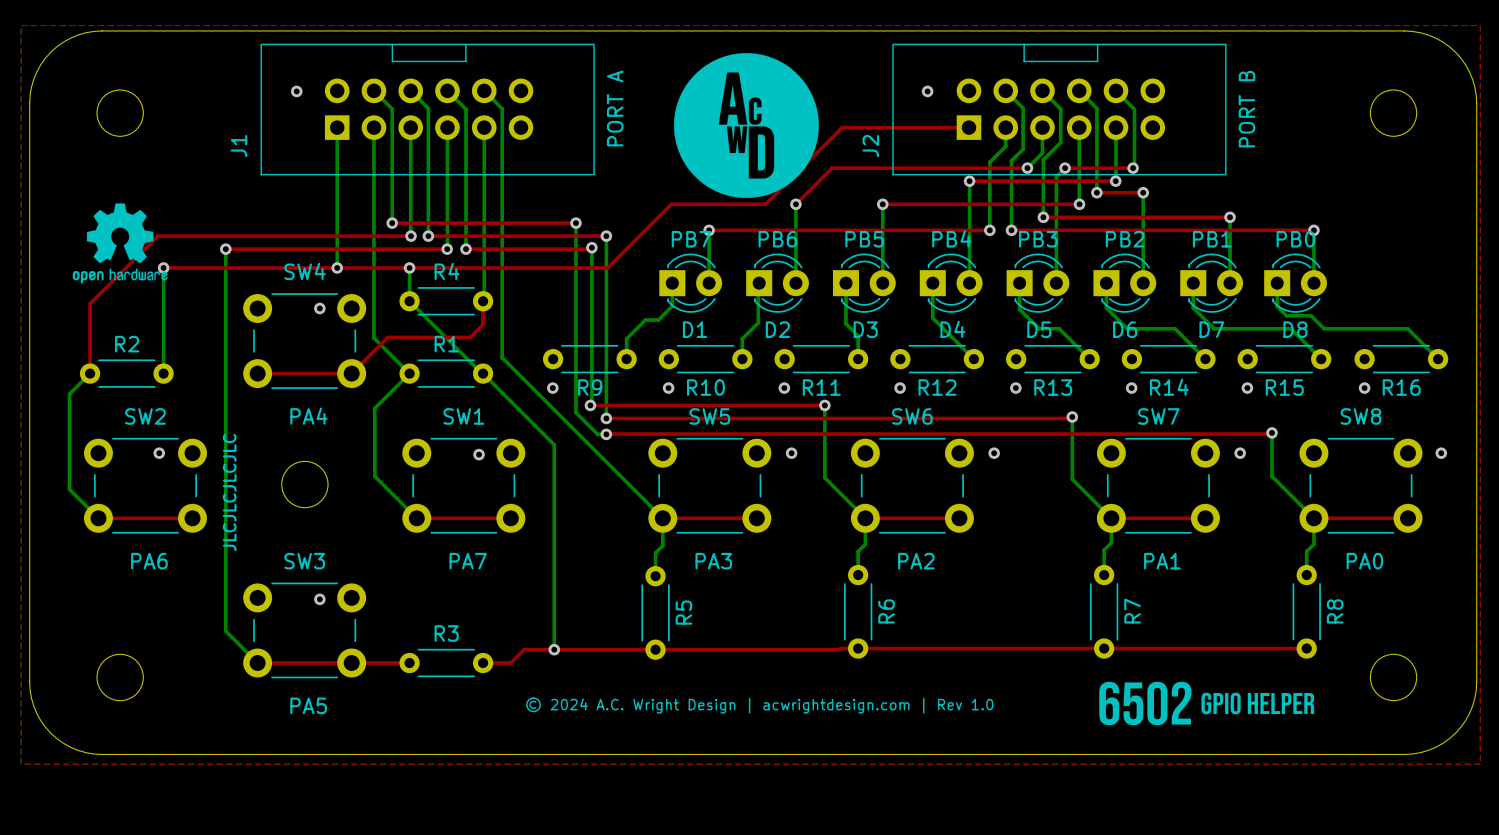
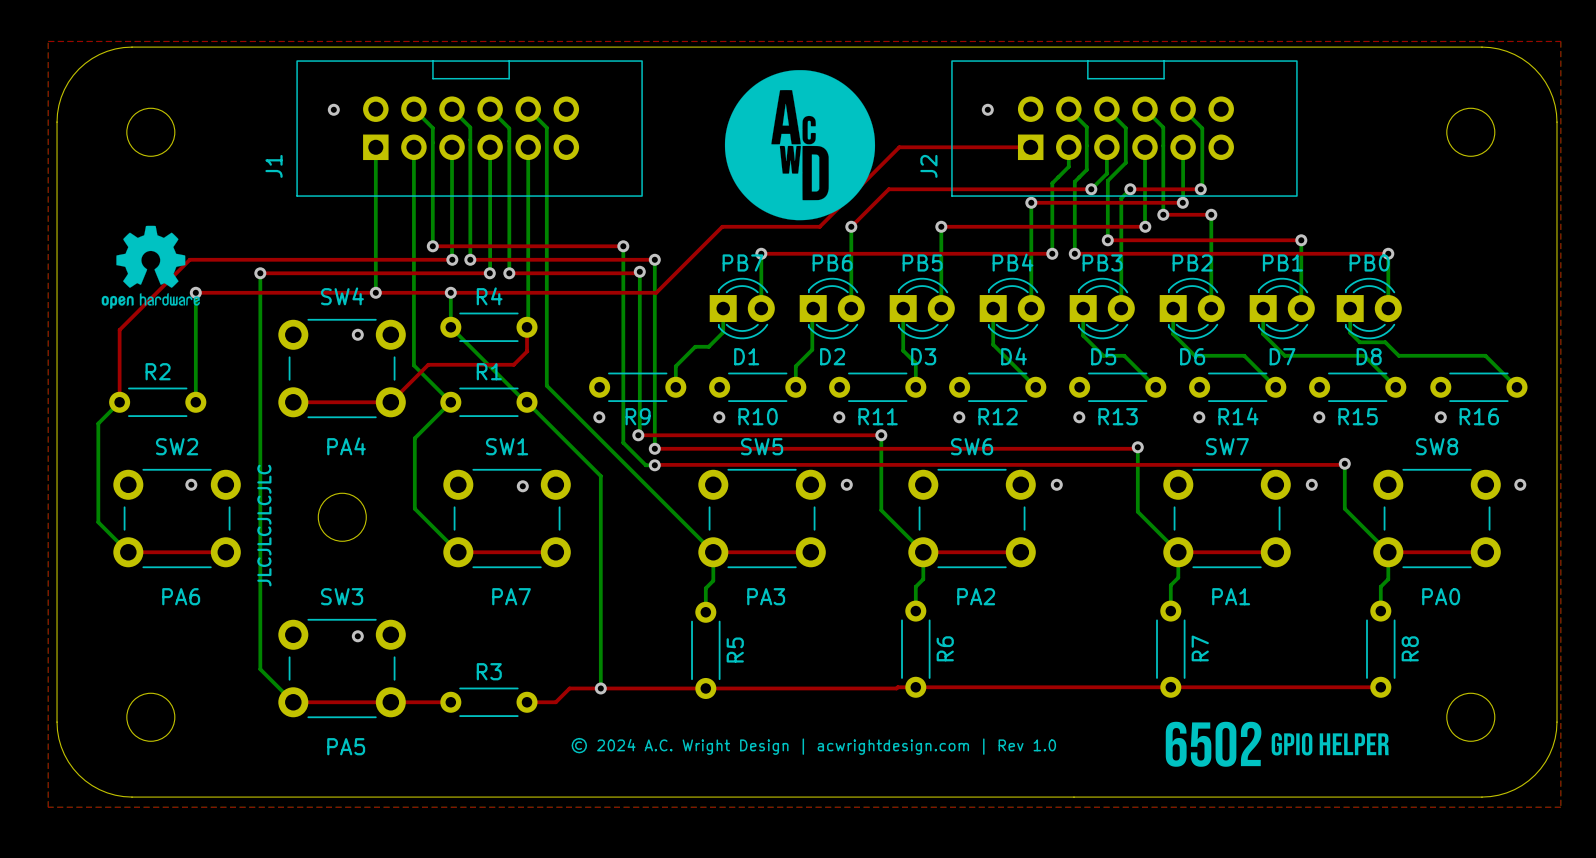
J1 value: PORT A (615, 108) -> none
J2 value: PORT B (1246, 109) -> none

